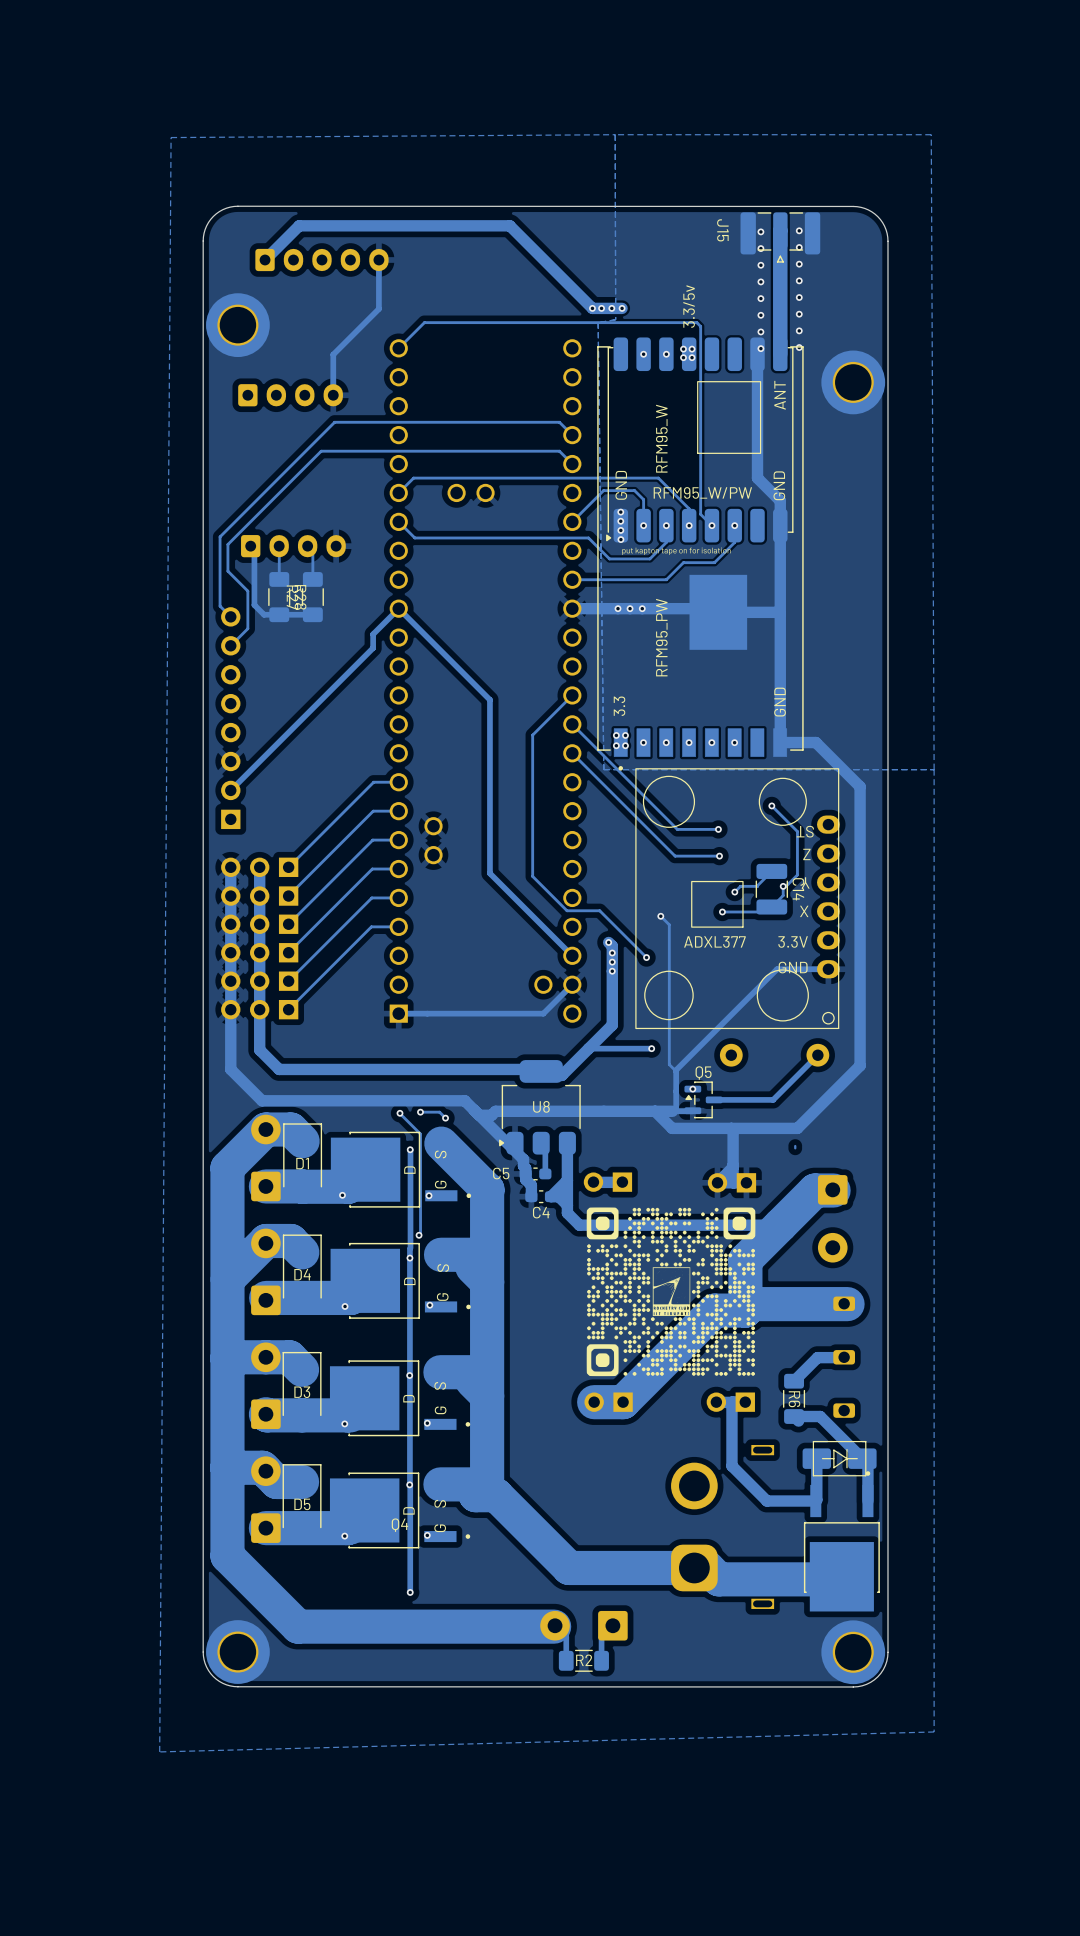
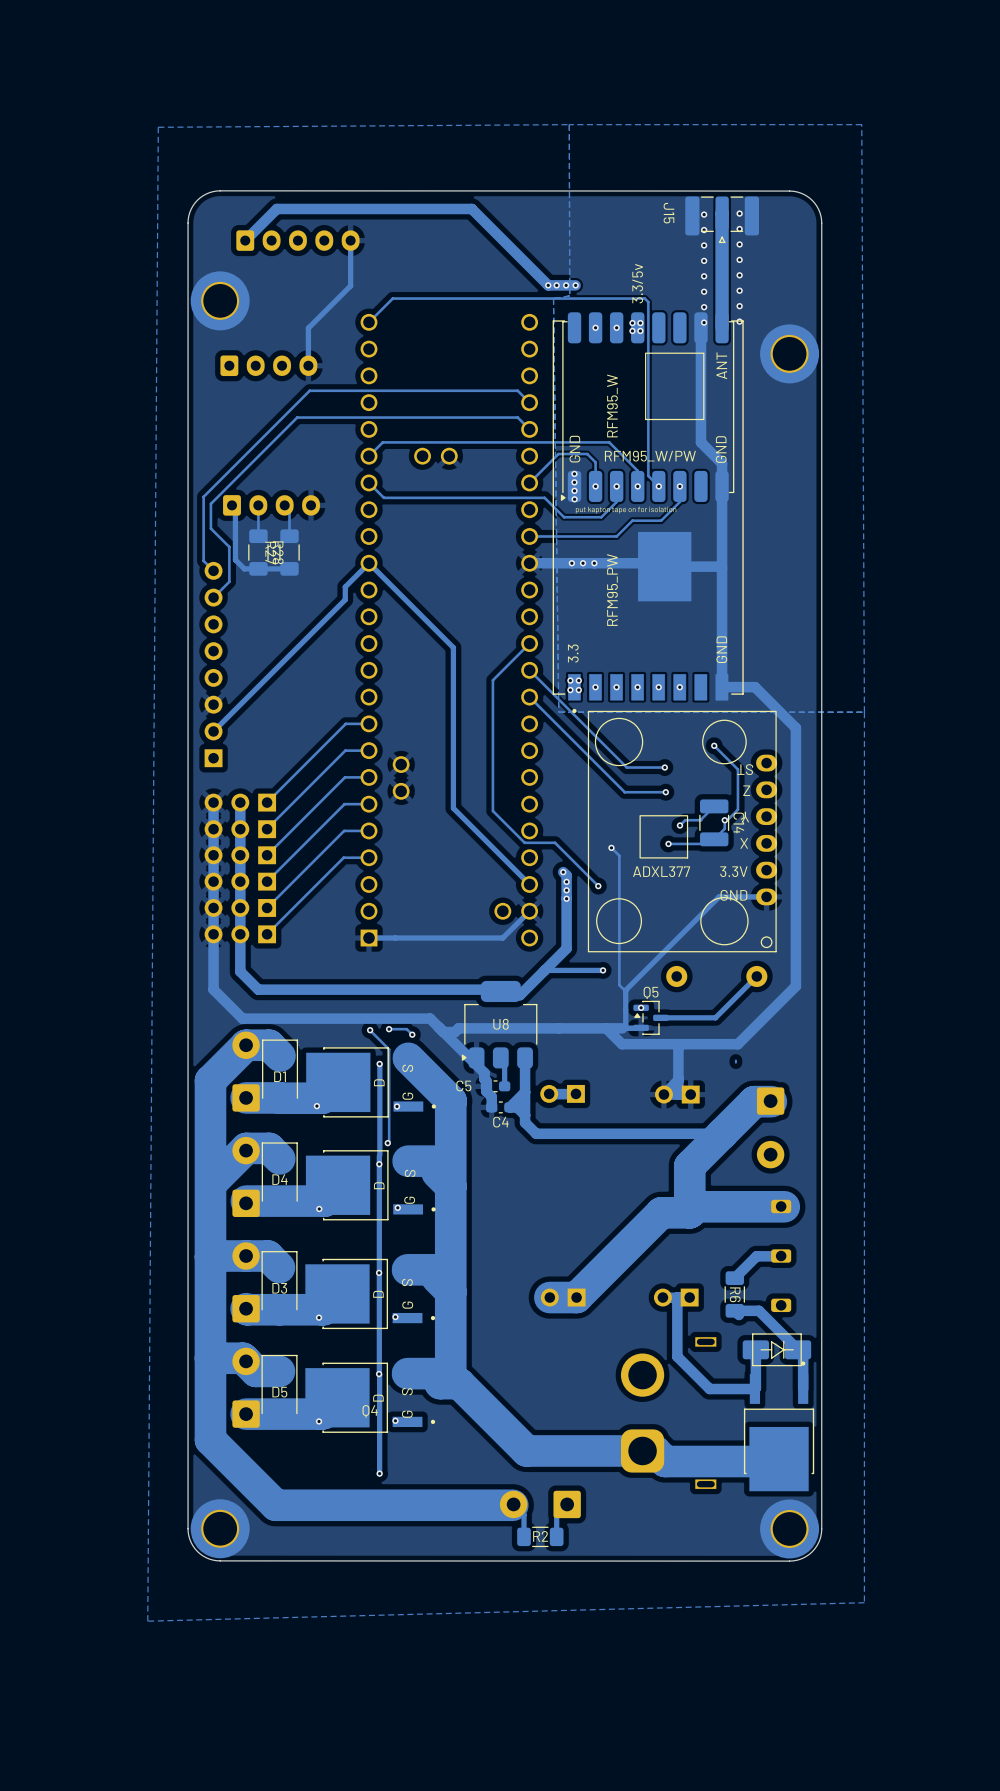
drawing: [586, 1207, 756, 1377] -> none

